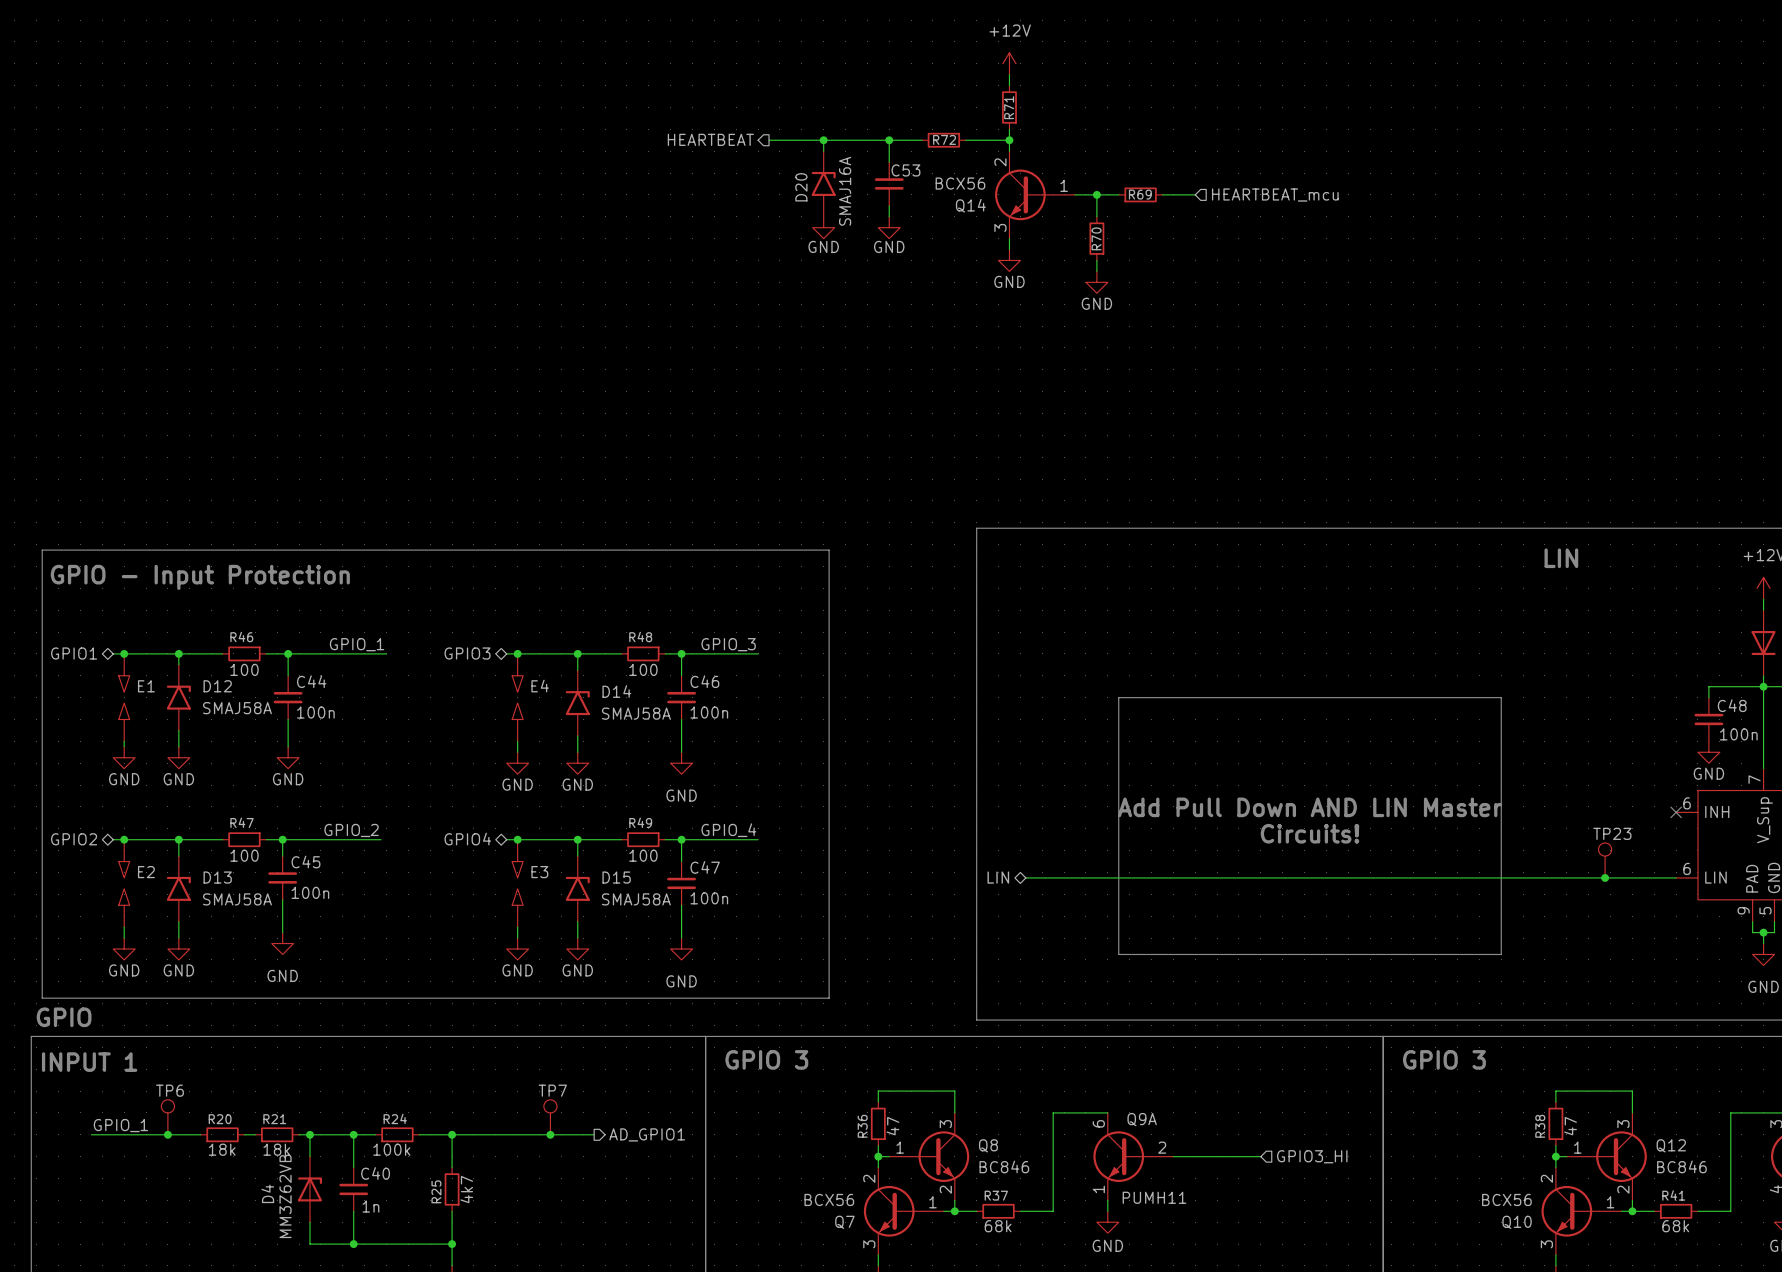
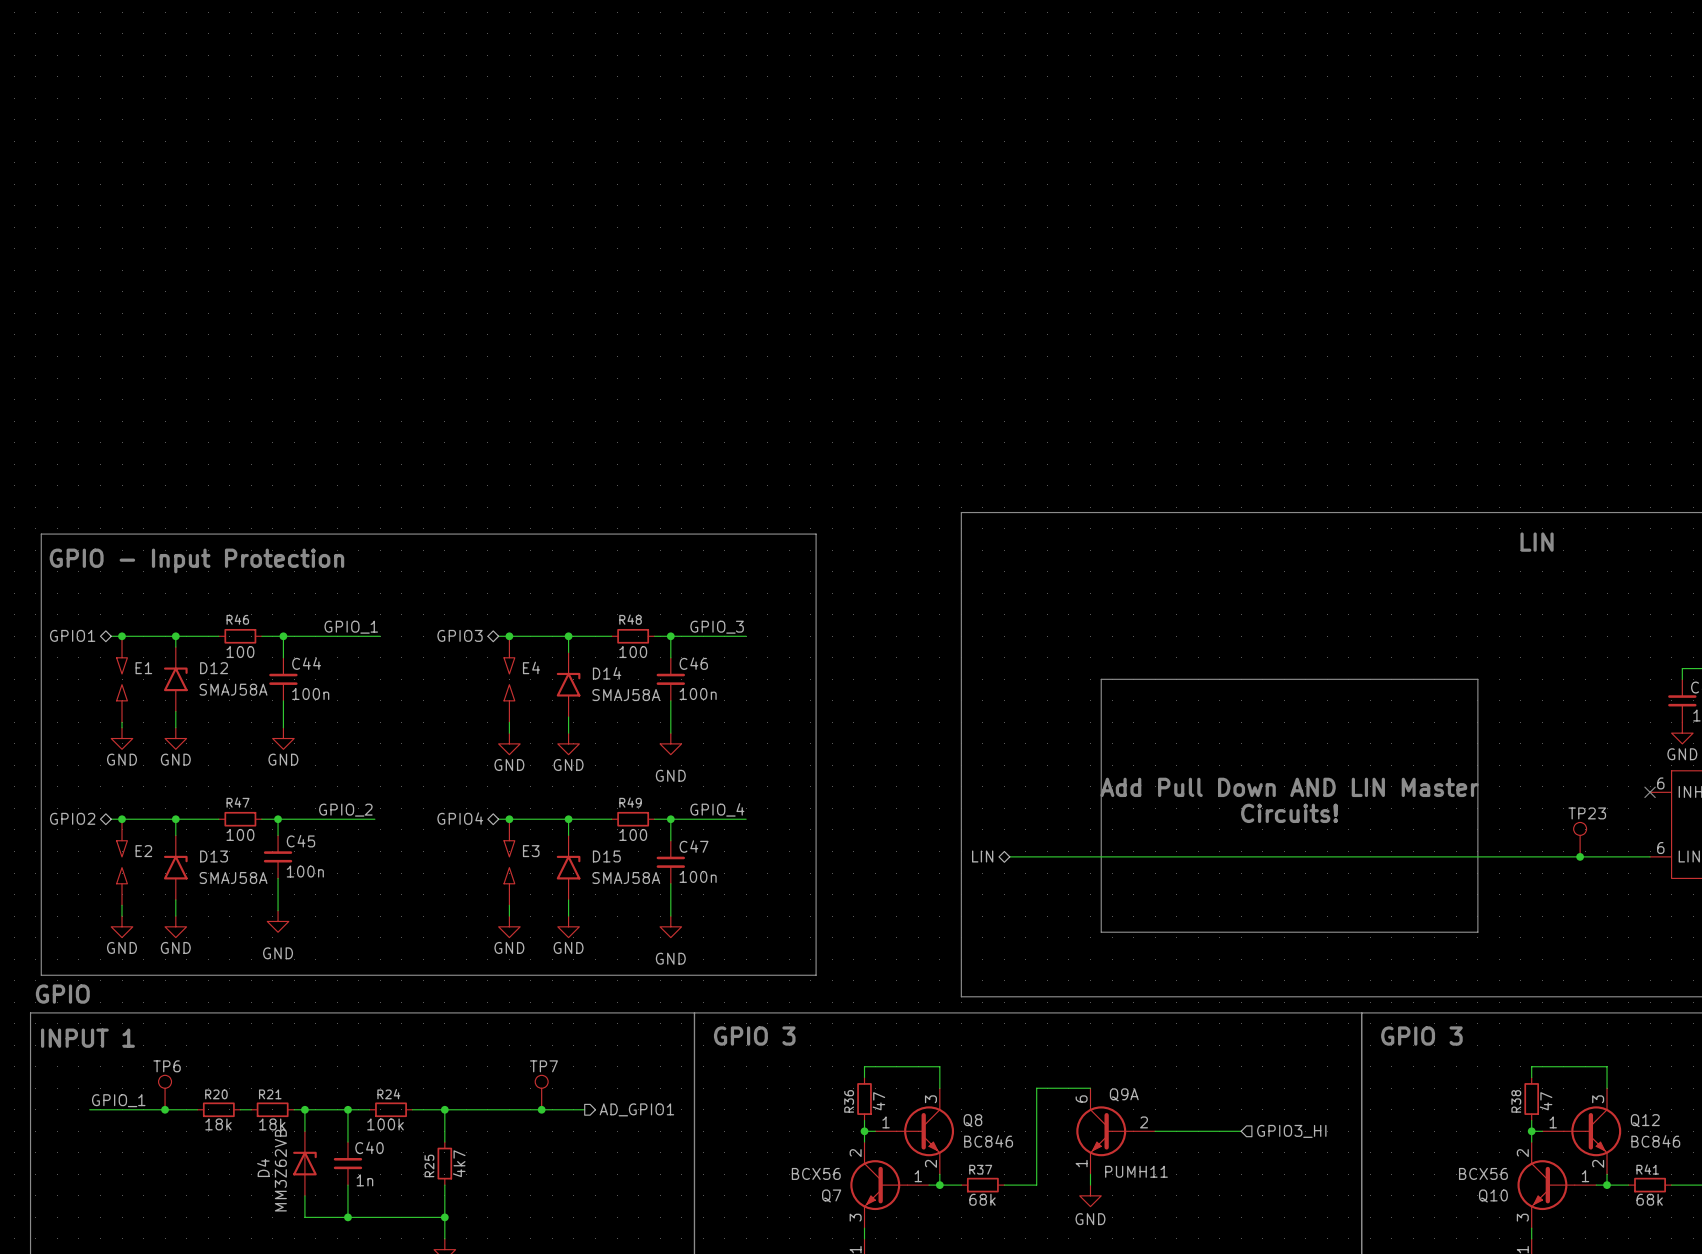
power symbol: +12V (1009, 63) -> none
wire: (1009, 74) (1009, 85) -> none
R71: (1009, 107) -> none
wire: (1009, 129) (1009, 151) -> none
hierarchical label: HEARTBEAT (710, 139) -> none
wire: (769, 140) (922, 140) -> none
wire: (823, 140) (823, 151) -> none
junction: (823, 140) -> none
wire: (889, 140) (889, 162) -> none
junction: (889, 140) -> none
R72: (943, 140) -> none
wire: (965, 140) (1009, 140) -> none
junction: (1009, 140) -> none
D20: SMAJ16A (823, 183) -> none
C53: (889, 183) -> none
Q14: BCX56 (1035, 194) -> none
wire: (1075, 194) (1118, 194) -> none
wire: (1096, 194) (1096, 216) -> none
junction: (1096, 194) -> none
R69: (1140, 194) -> none
wire: (1162, 194) (1195, 194) -> none
hierarchical label: HEARTBEAT_mcu (1275, 195) -> none
wire: (889, 205) (889, 216) -> none
power symbol: GND (823, 227) -> none
power symbol: GND (889, 227) -> none
wire: (1009, 238) (1009, 249) -> none
R70: (1096, 238) -> none
power symbol: GND (1009, 260) -> none
wire: (1096, 260) (1096, 271) -> none
power symbol: GND (1096, 282) -> none

